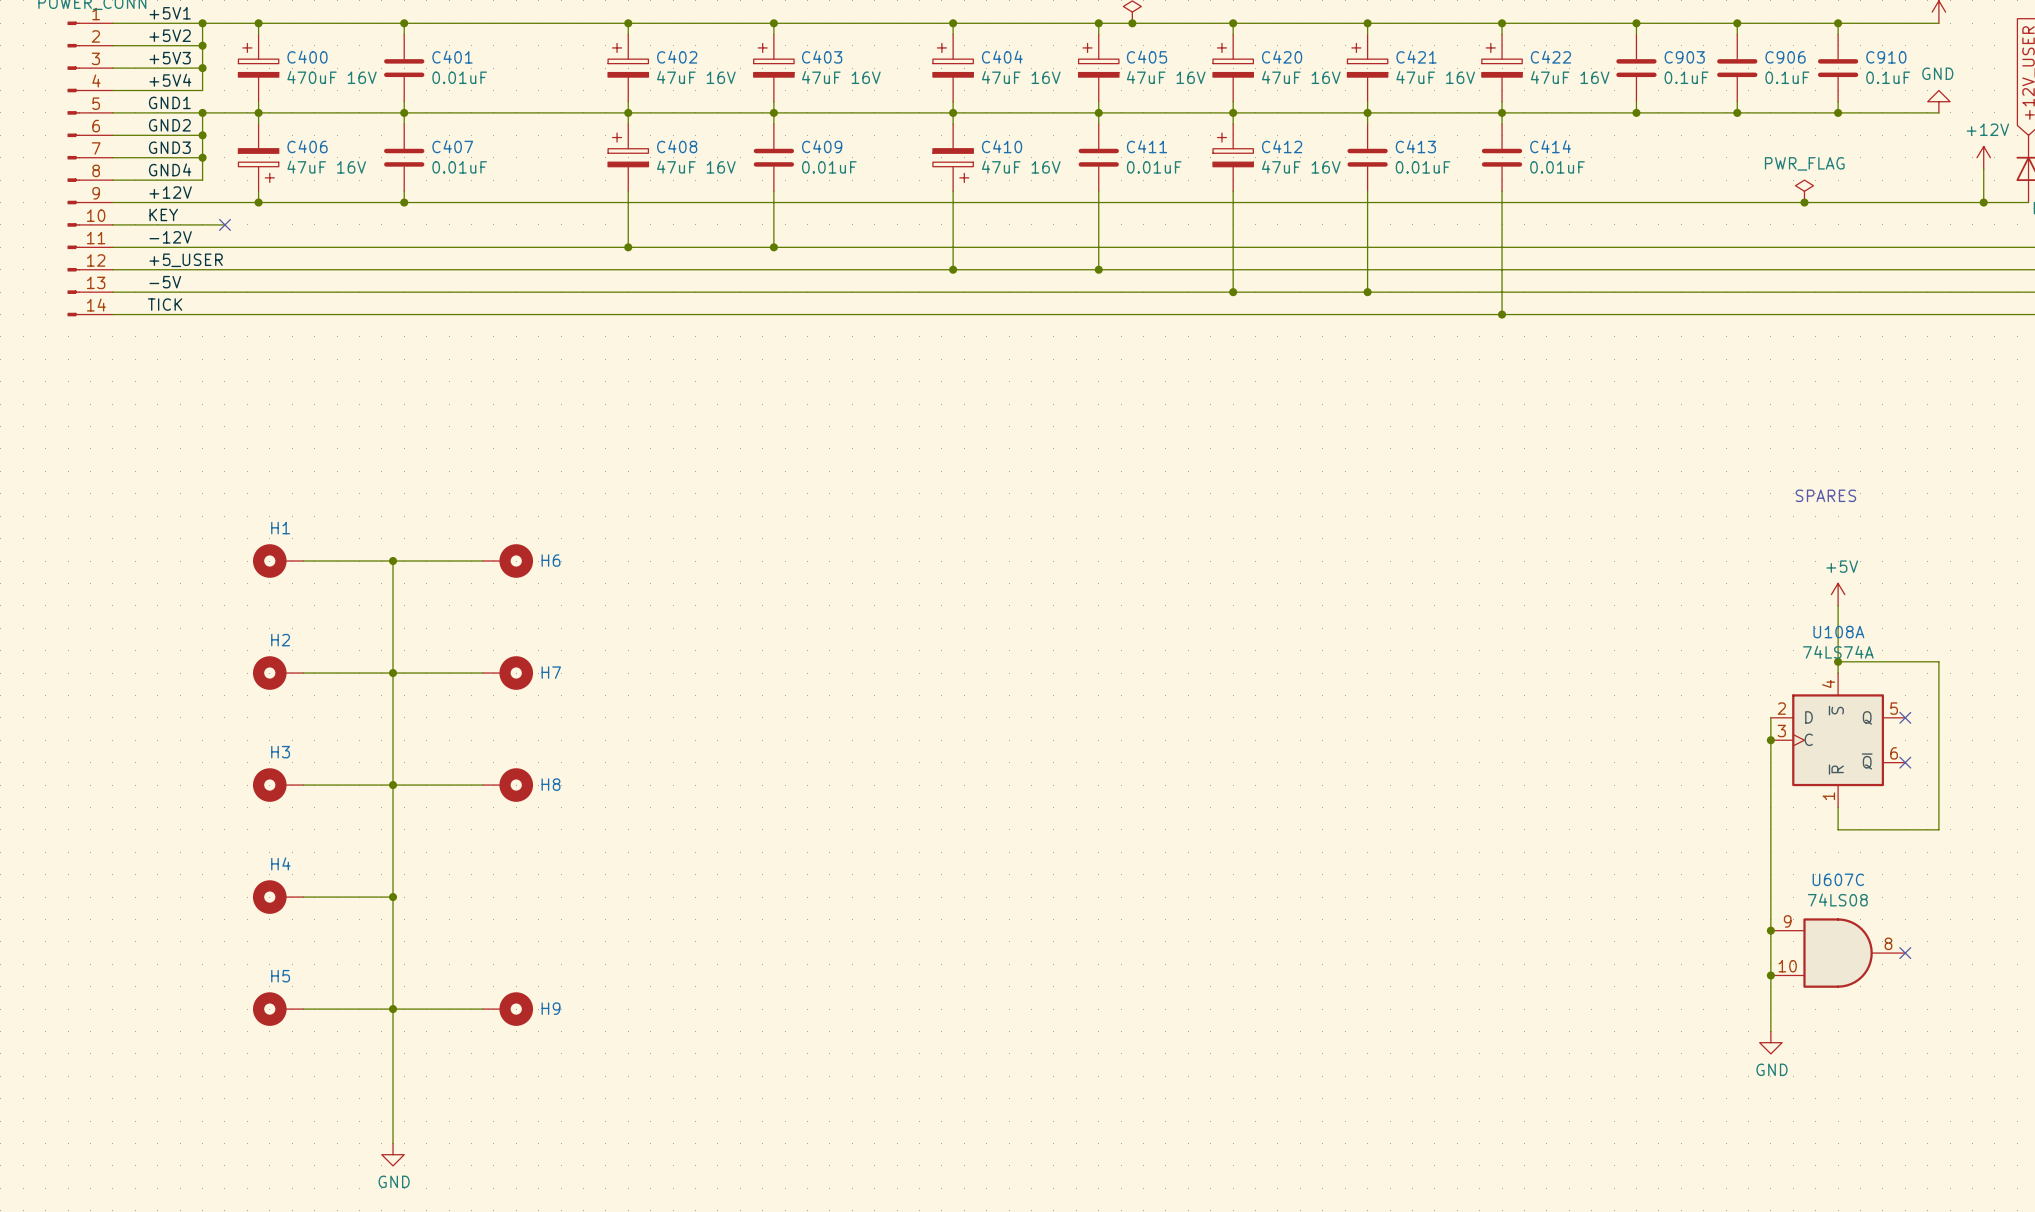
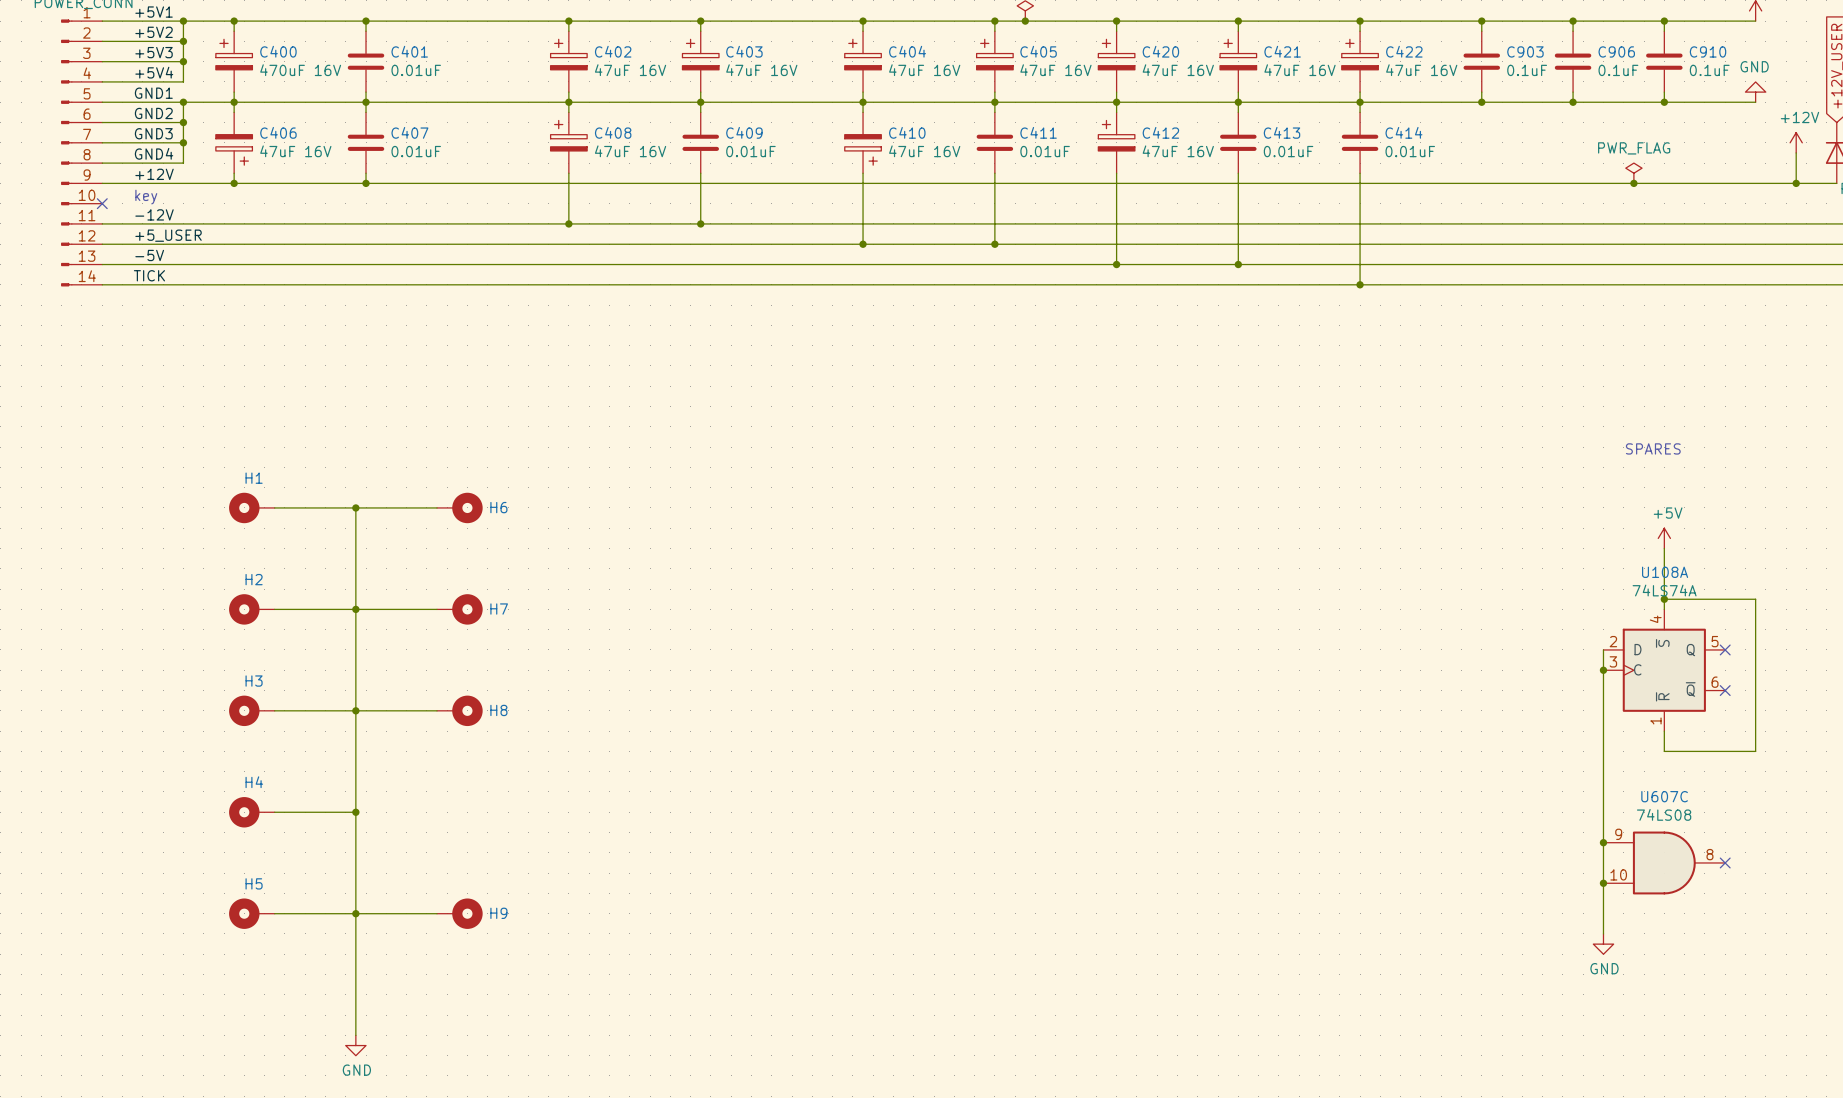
label: KEY (163, 214) -> none
text: none -> key (146, 197)
wire: (112, 224) (224, 224) -> none
no-connect mark: none -> (102, 203)
no-connect mark: (224, 224) -> none

